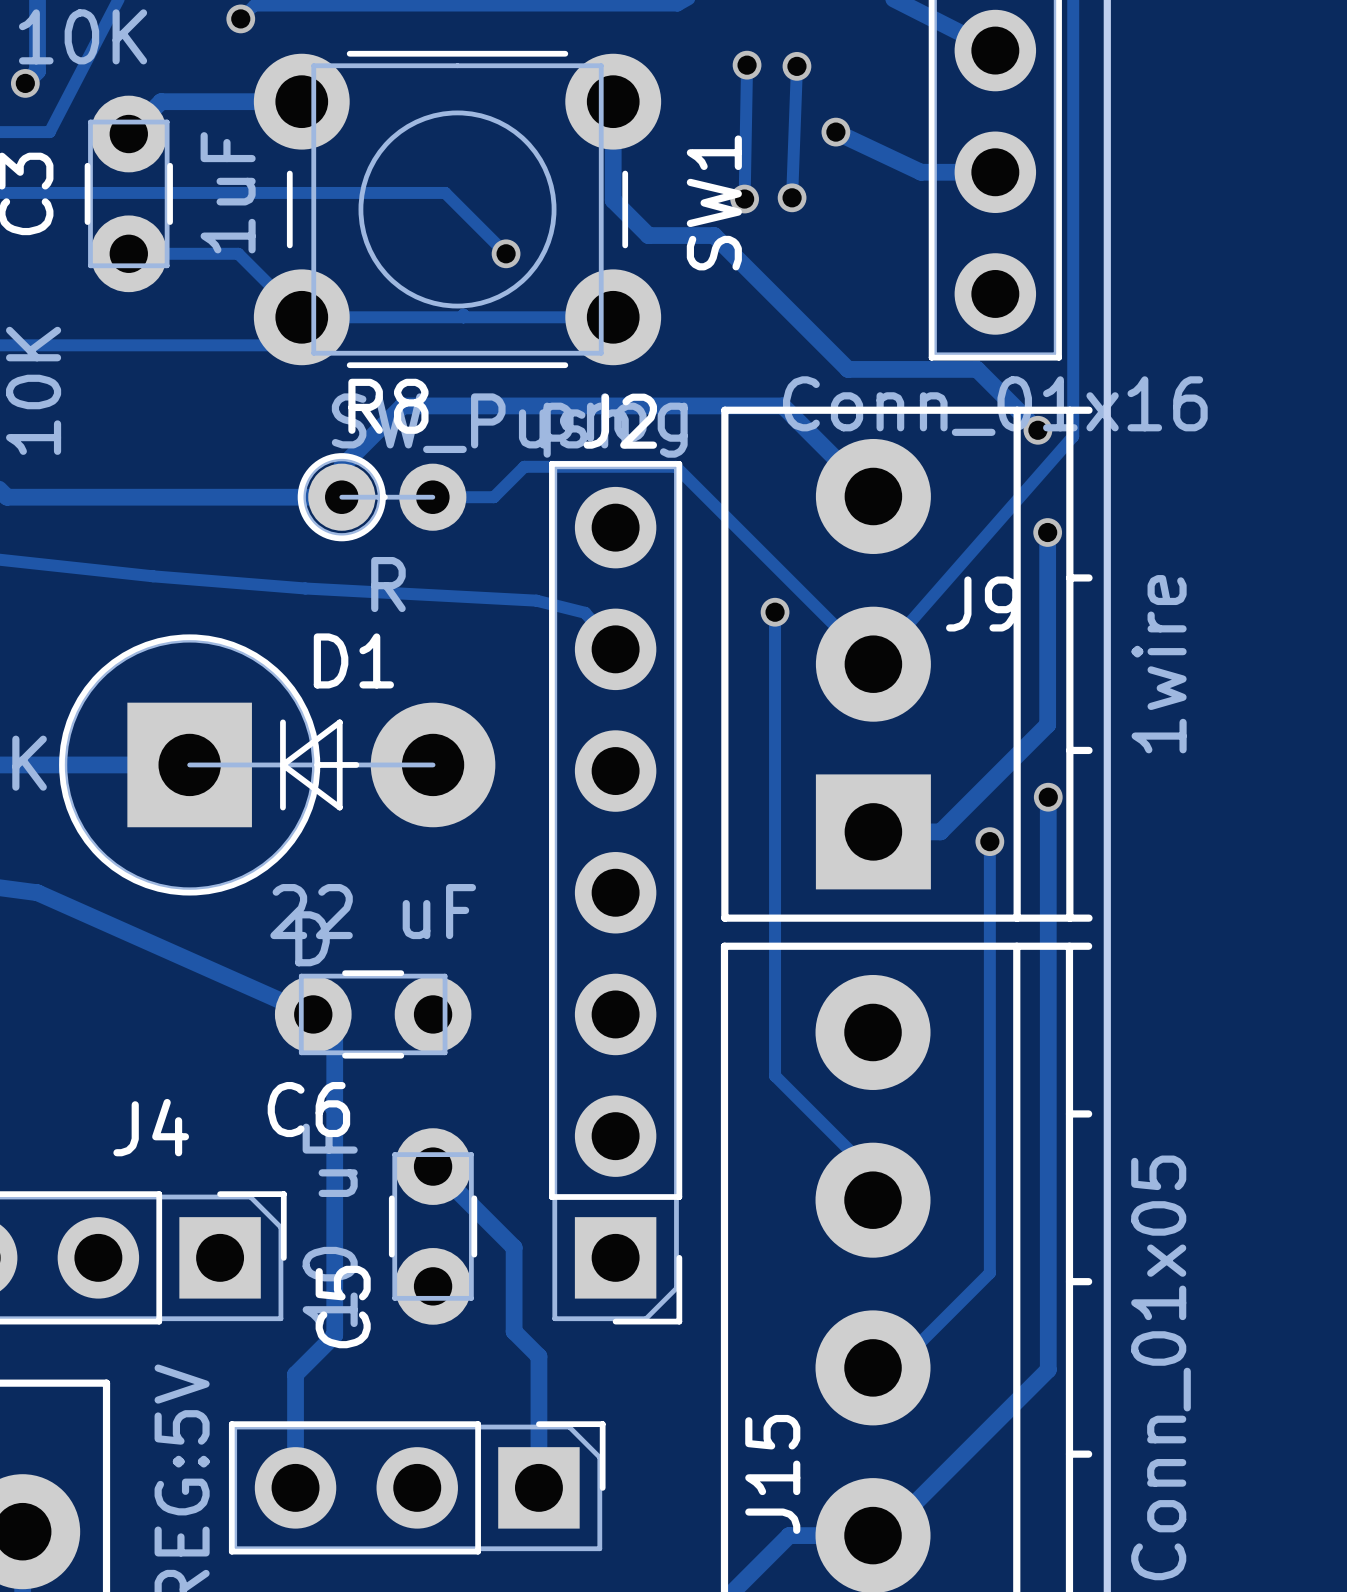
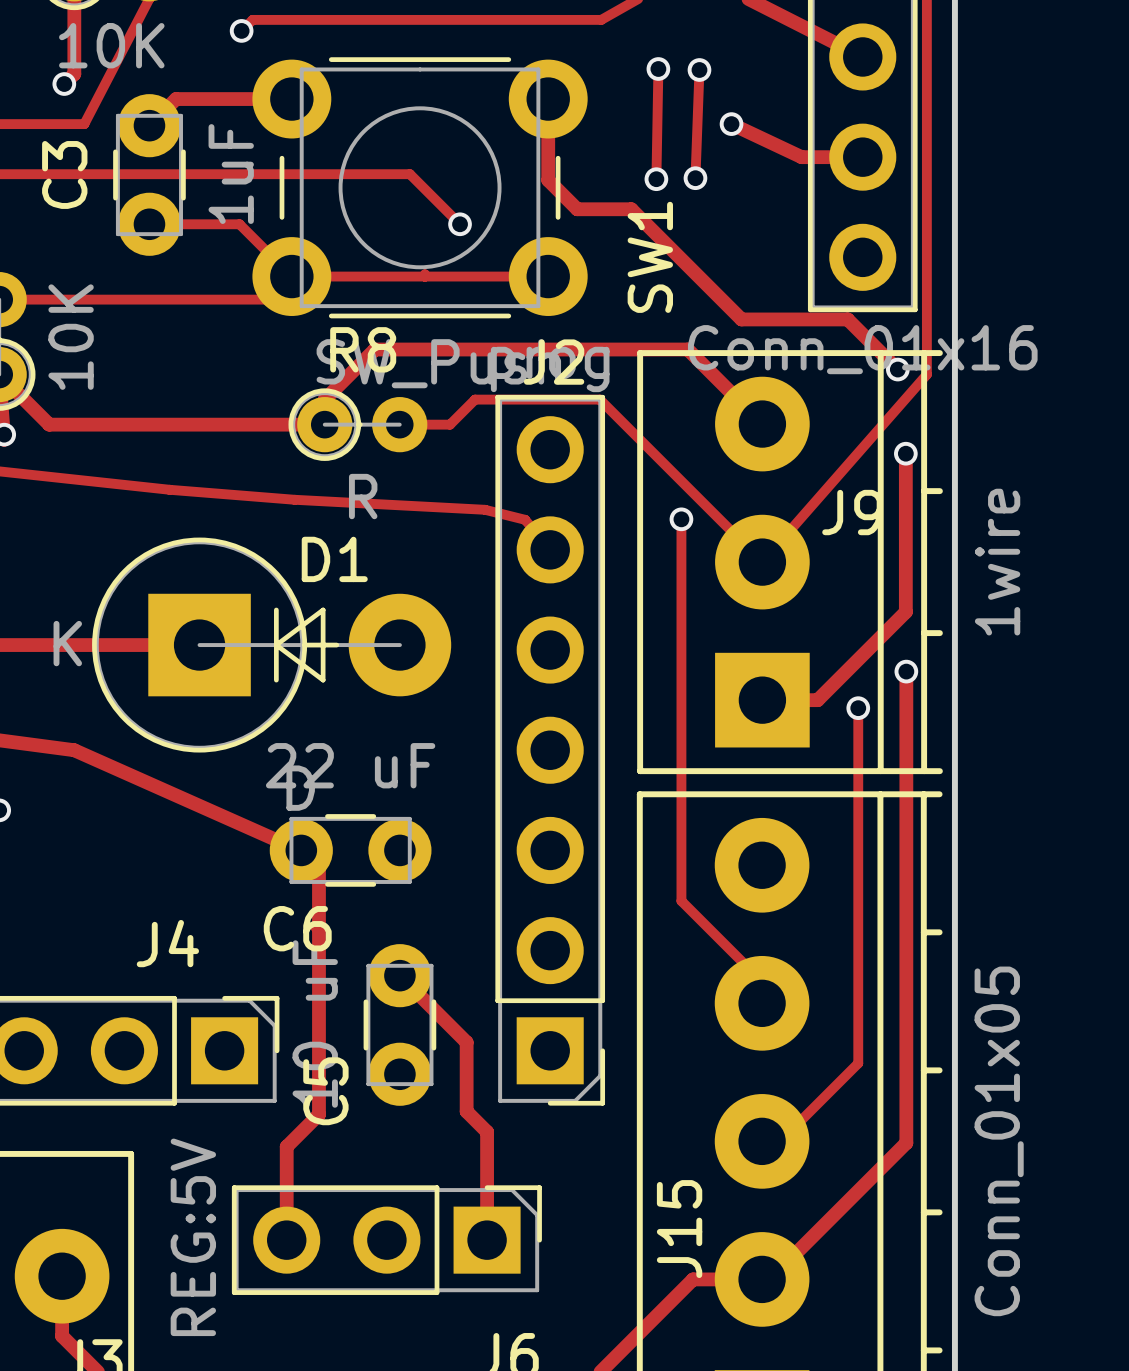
SW1 name position: SW1 (714, 202) -> SW1 (650, 257)

